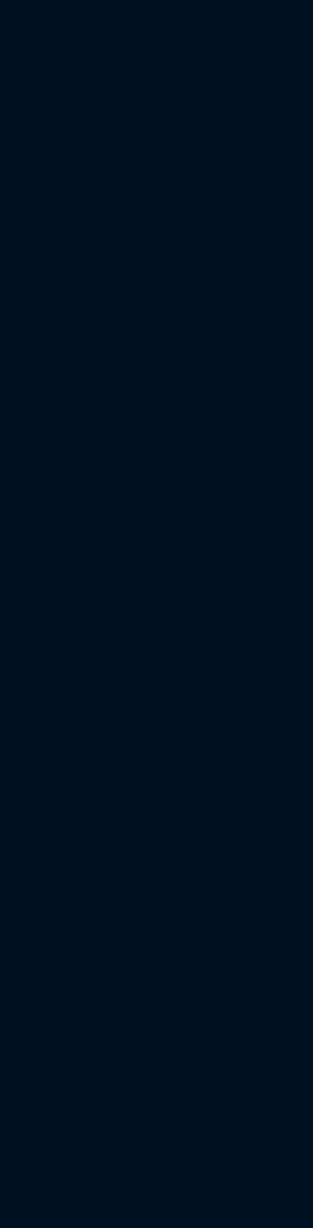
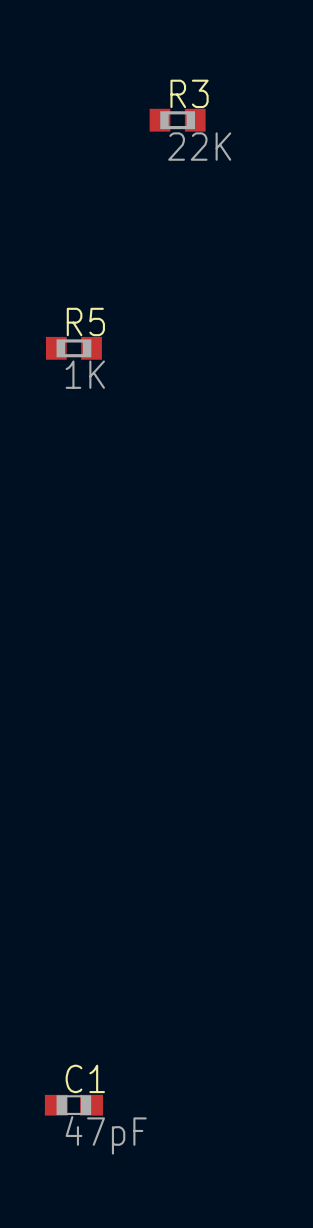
R3: none -> 22K (177, 120)
R5: none -> 1K (73, 348)
C1: none -> 47pF (73, 1105)

